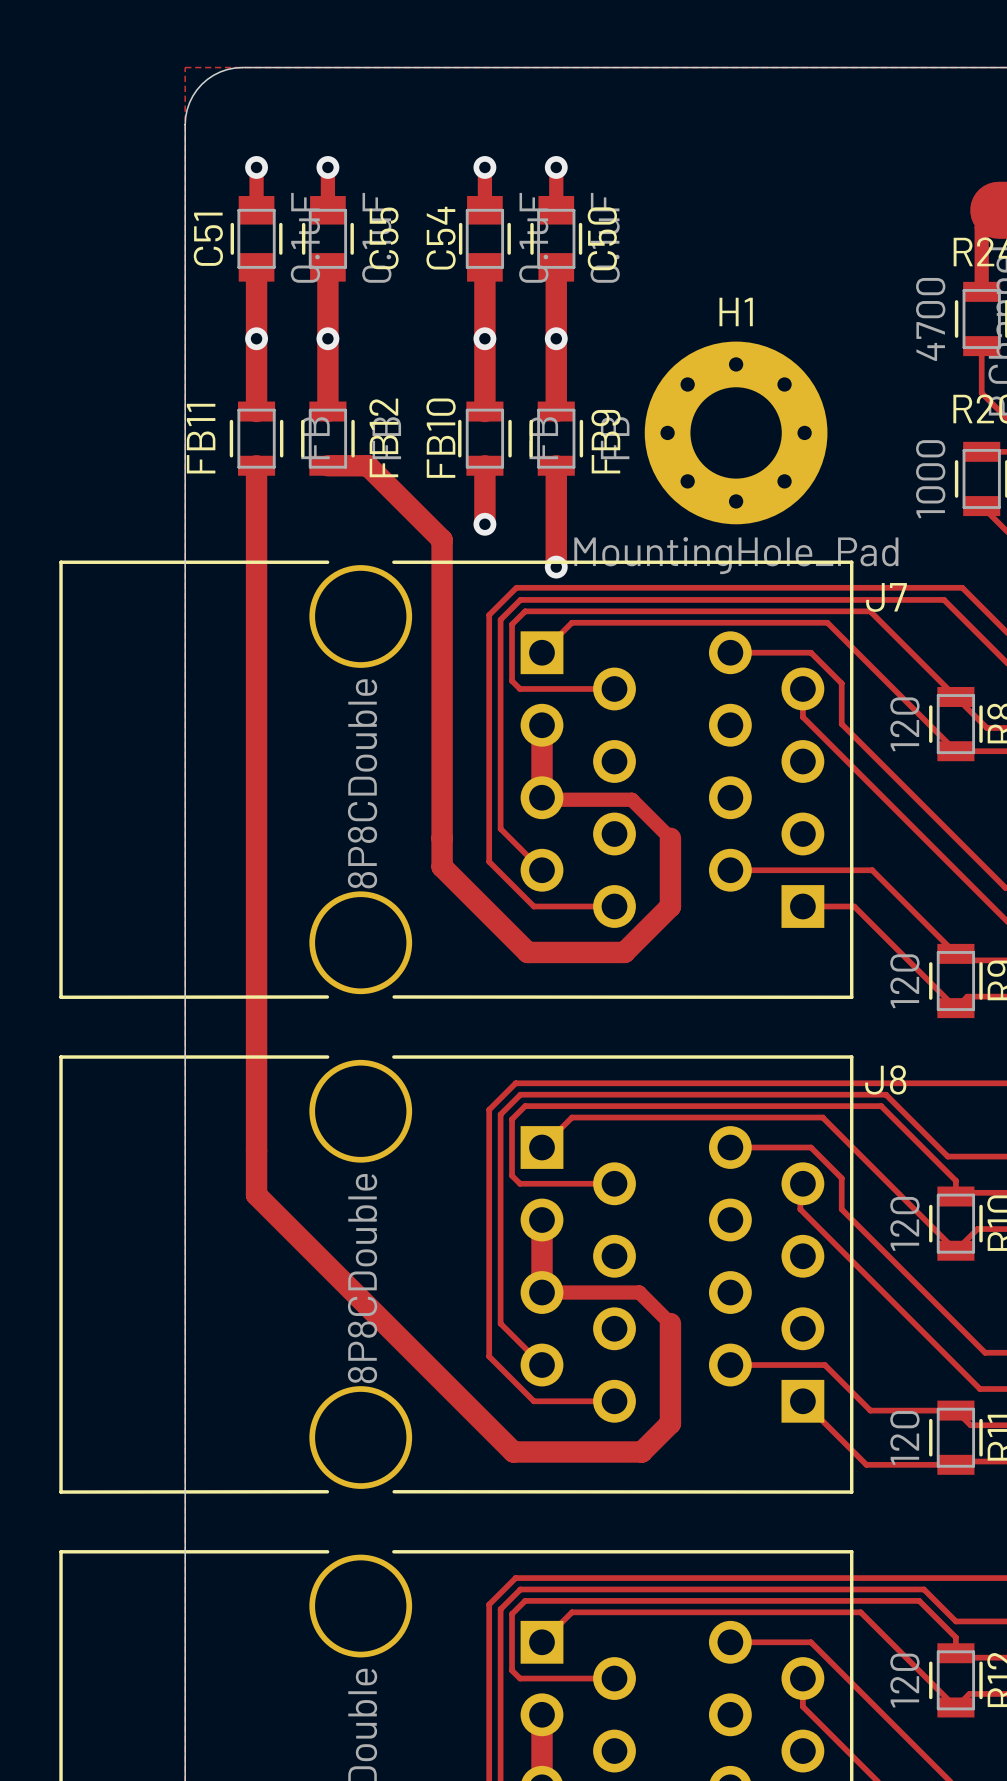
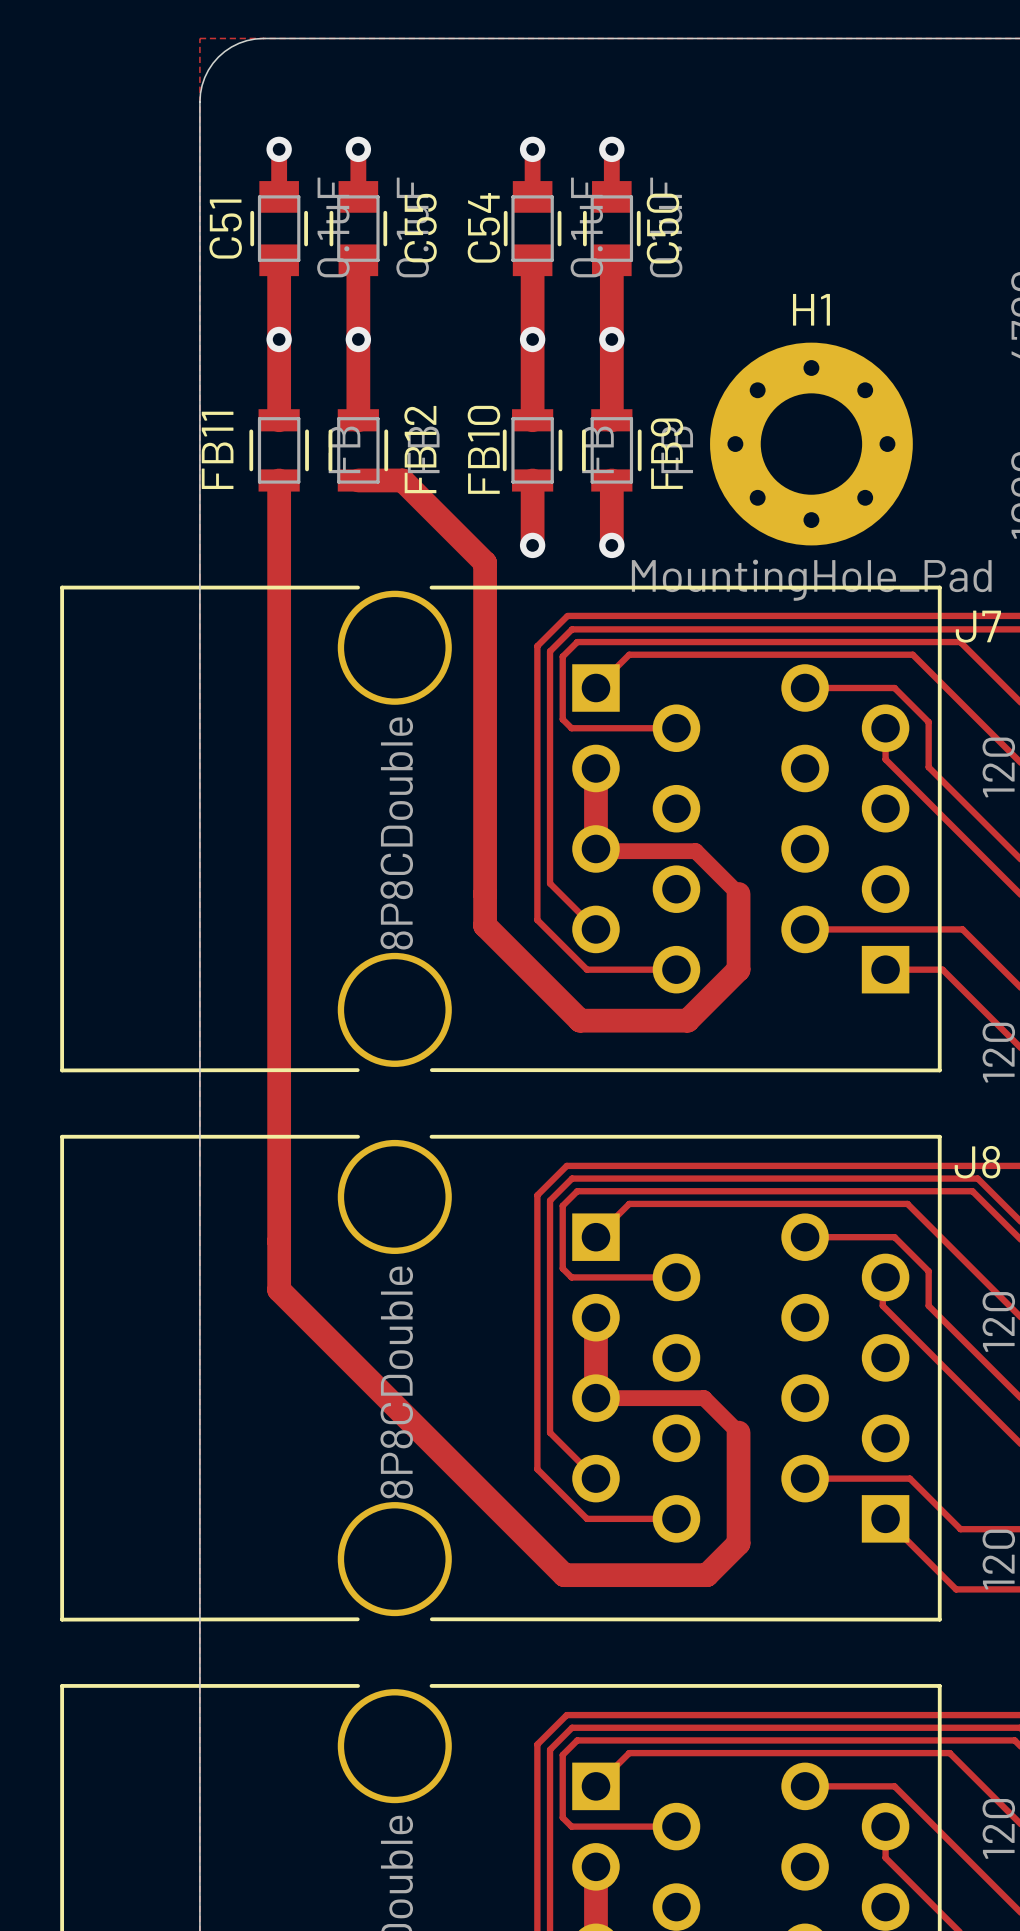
track: (556, 524) (556, 567) -> none
via position: (556, 567) -> (611, 545)

